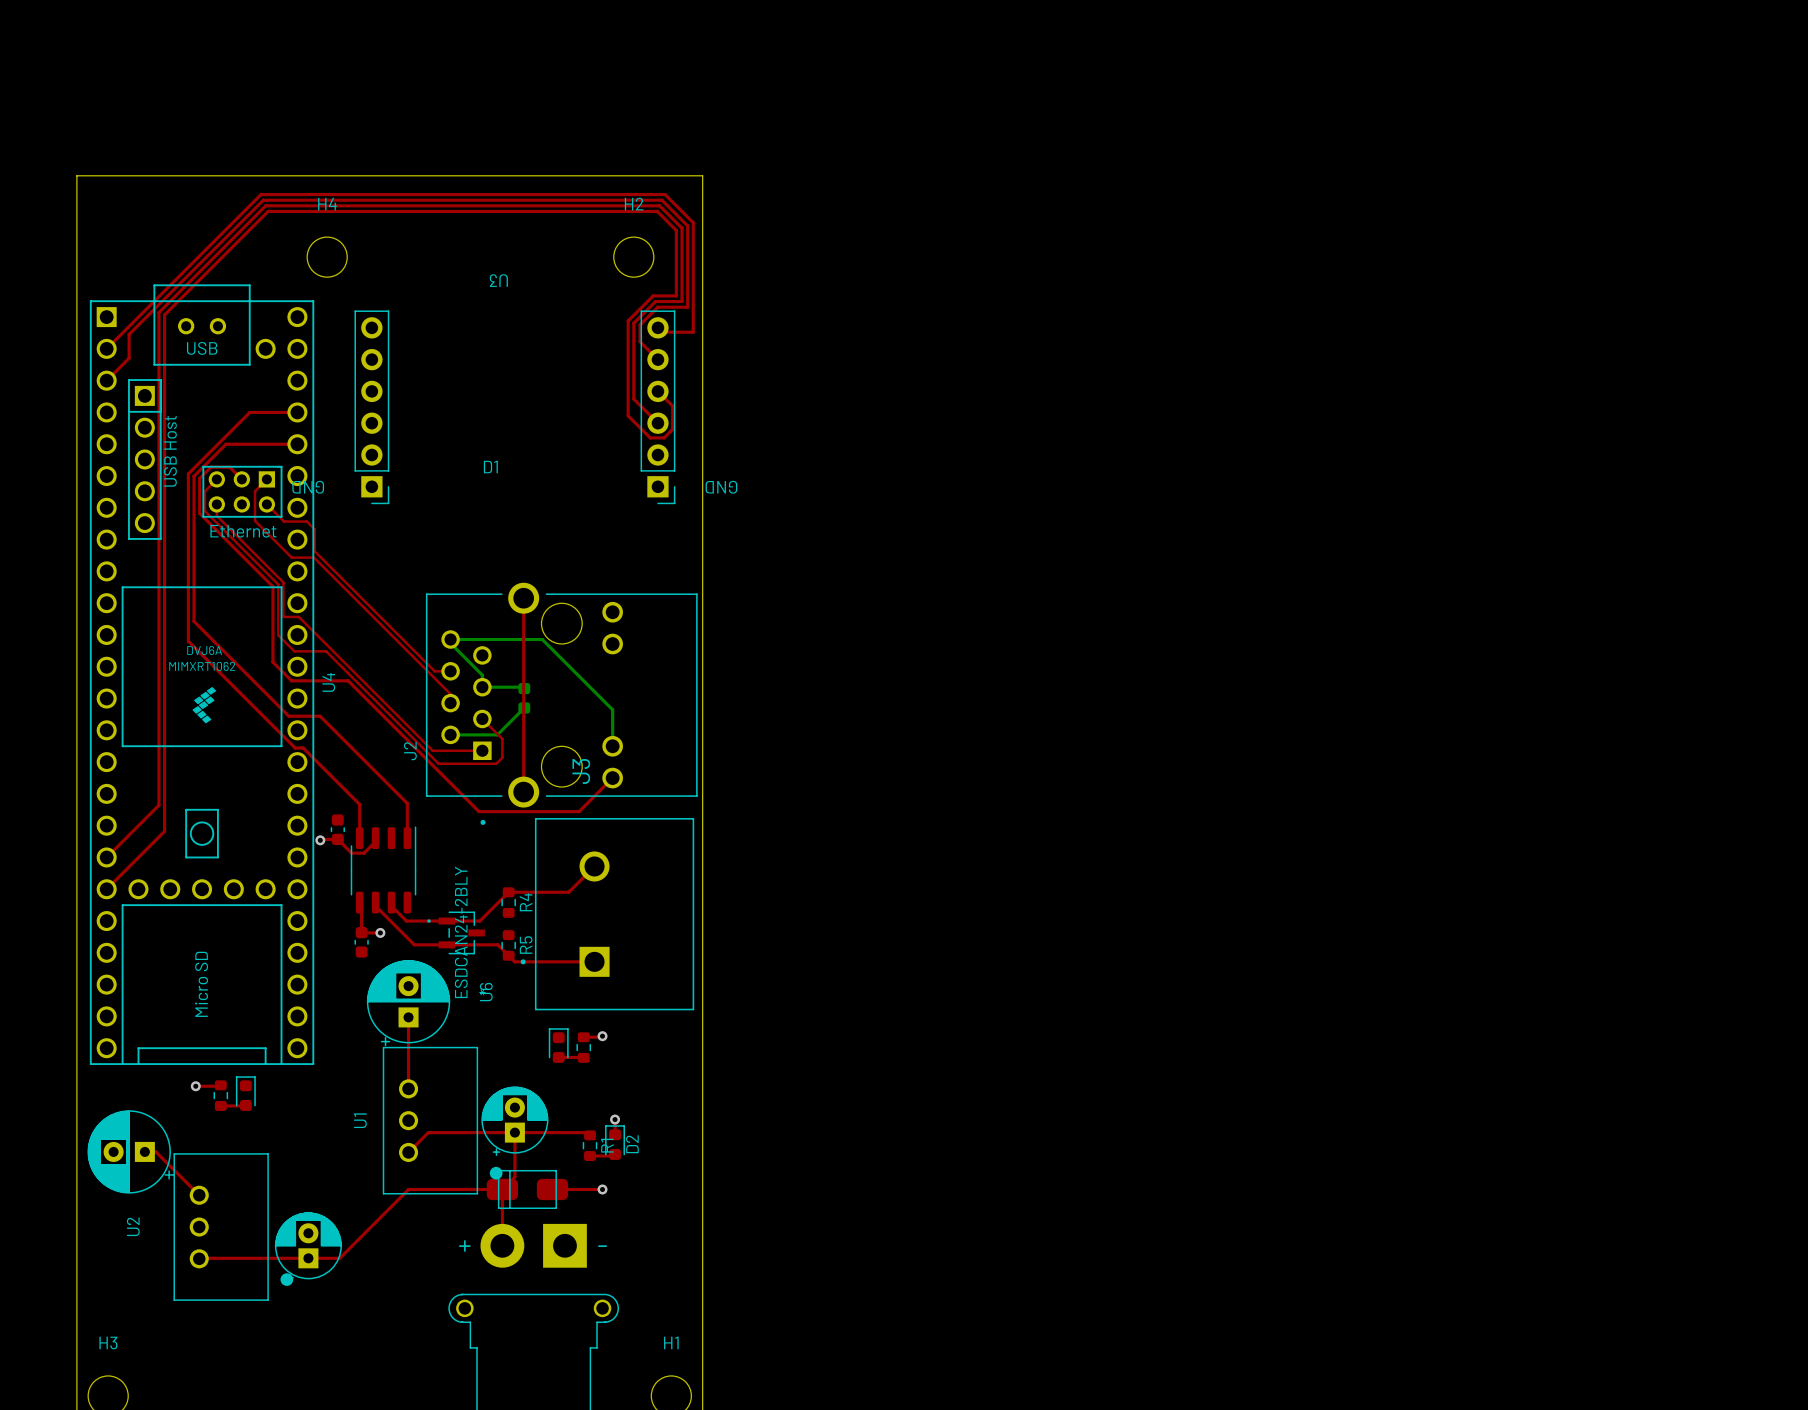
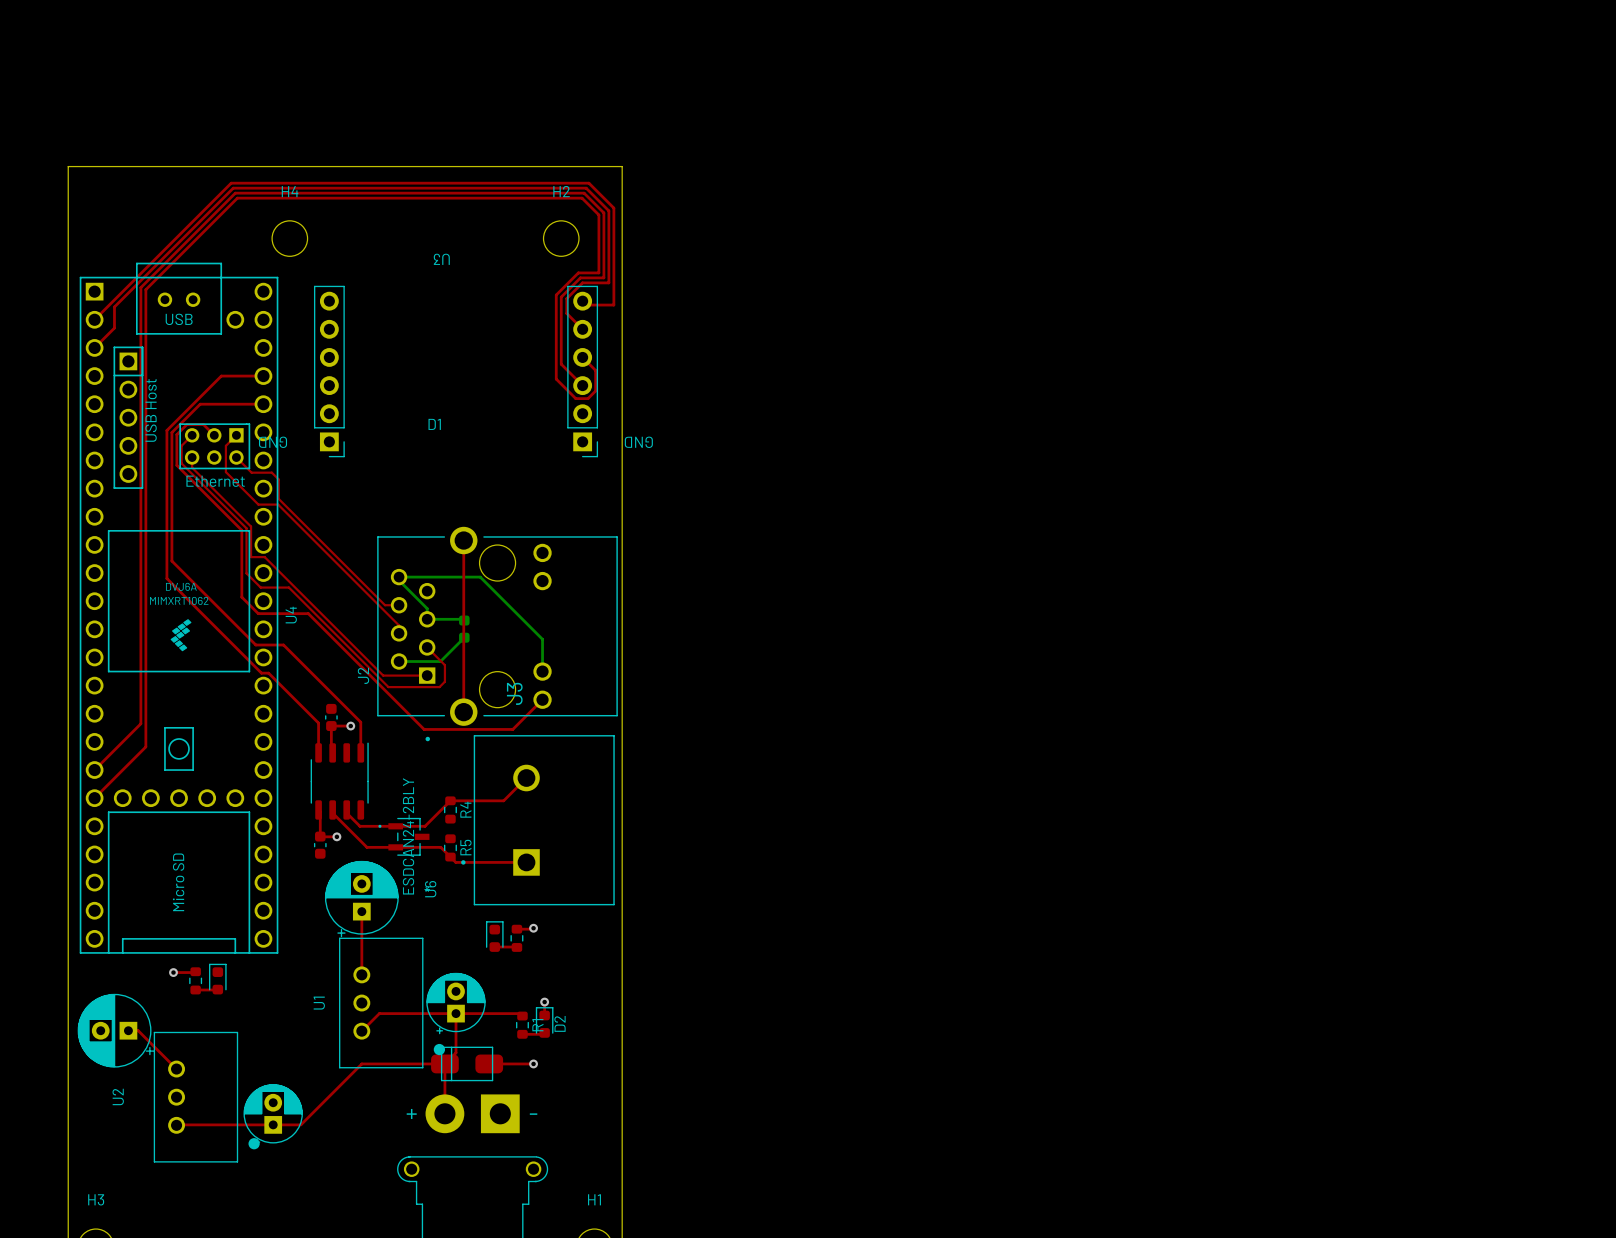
via: none -> (350, 726)
part position: (337, 829) -> (331, 717)
top track: (375, 838) (375, 841) (364, 853) (351, 853) (337, 839) (320, 840) -> (332, 752) (331, 726) (350, 726)
via: (320, 840) -> none

